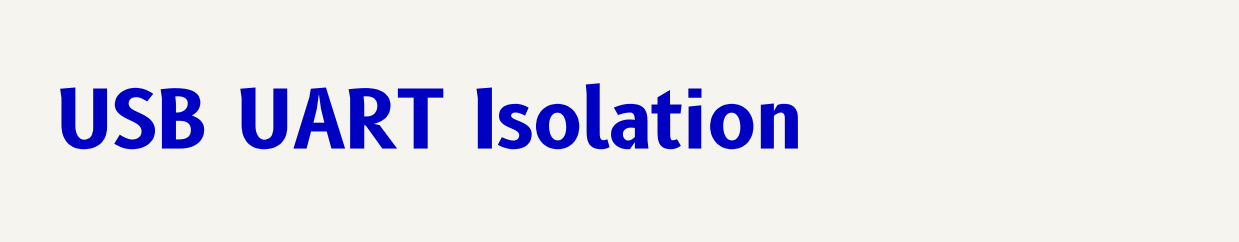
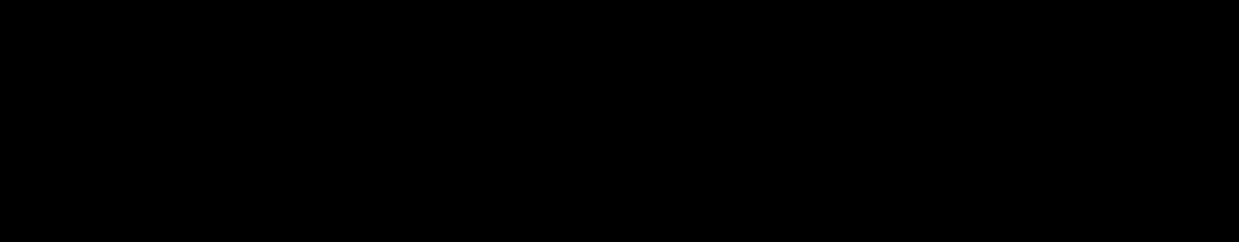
text: USB UART Isolation (429, 116) -> none

